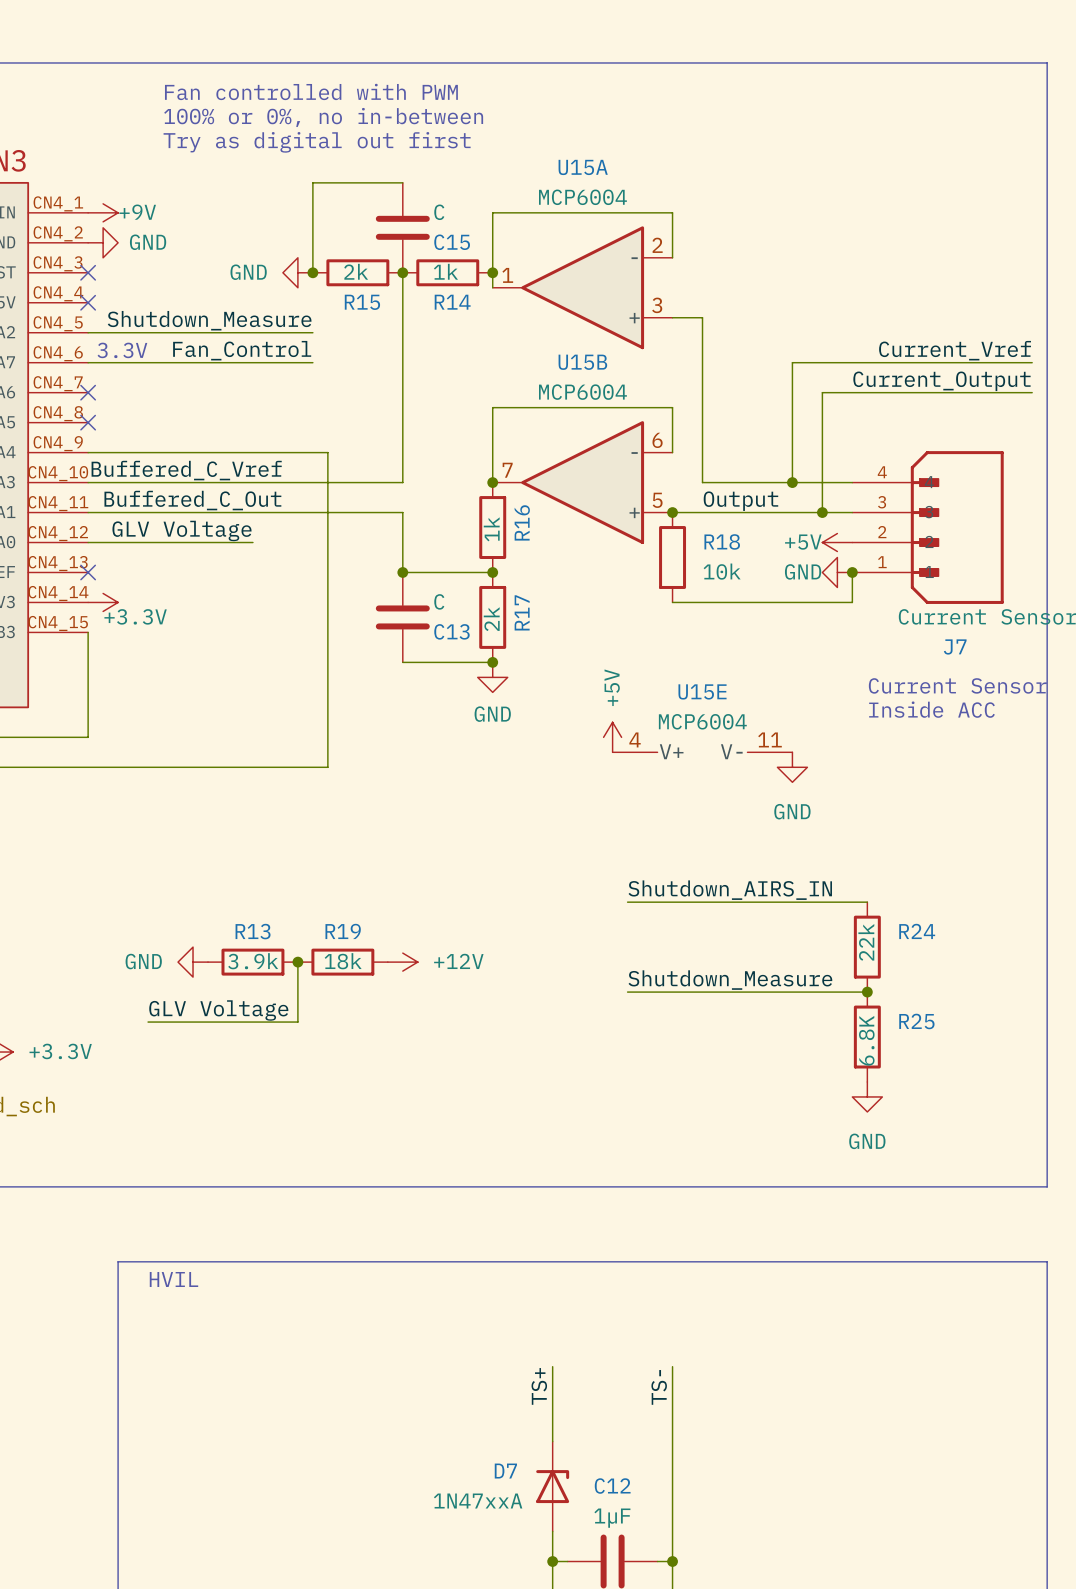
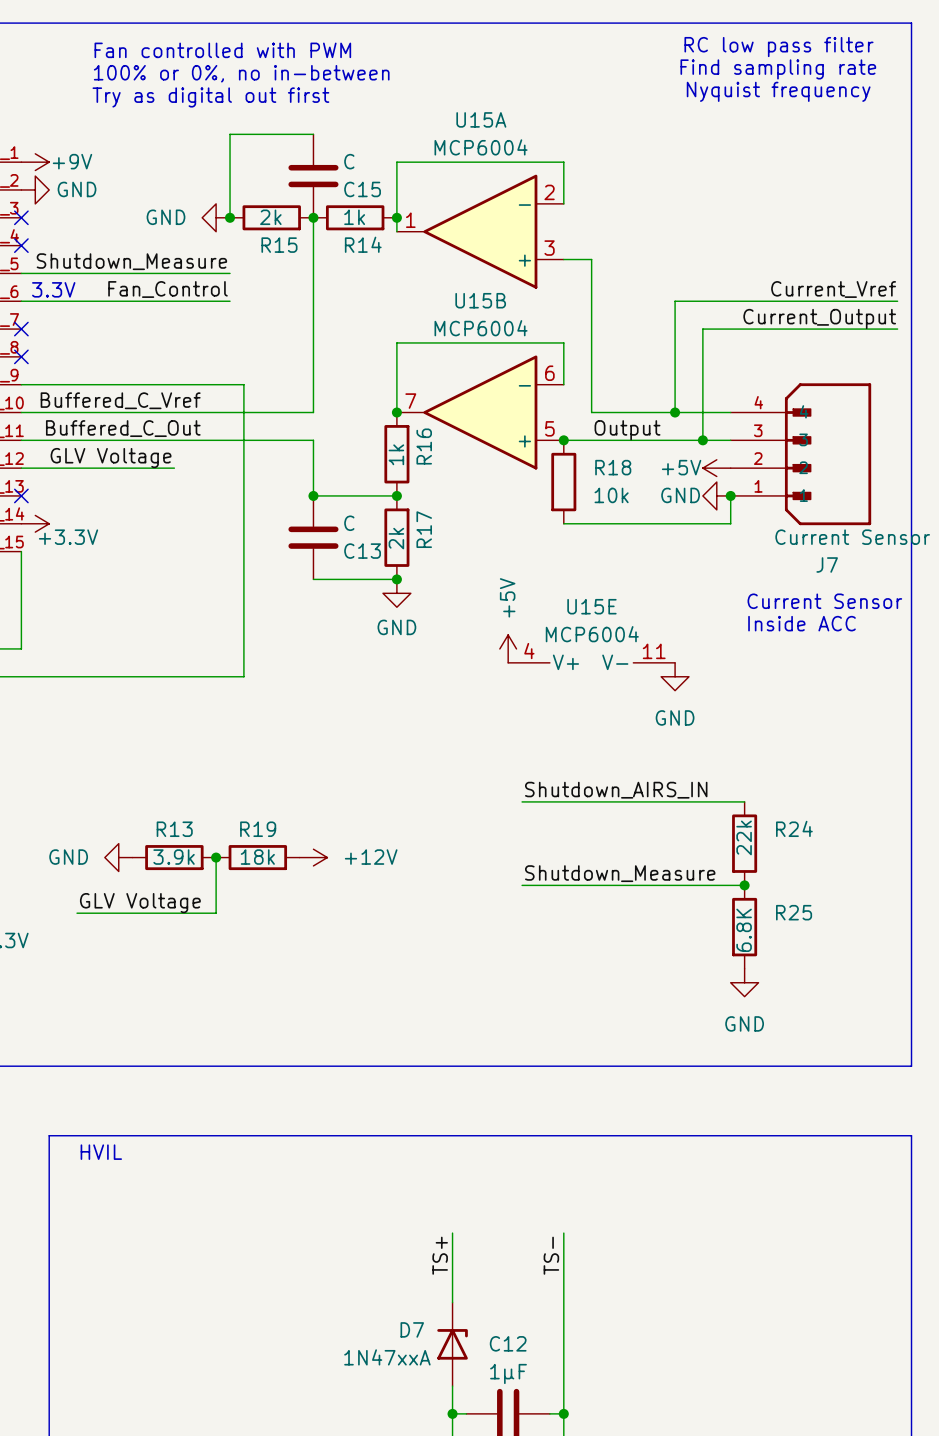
text: none -> RC low pass filter (778, 47)
text: none -> Find sampling rate (778, 69)
text: none -> Nyquist frequency (778, 91)

